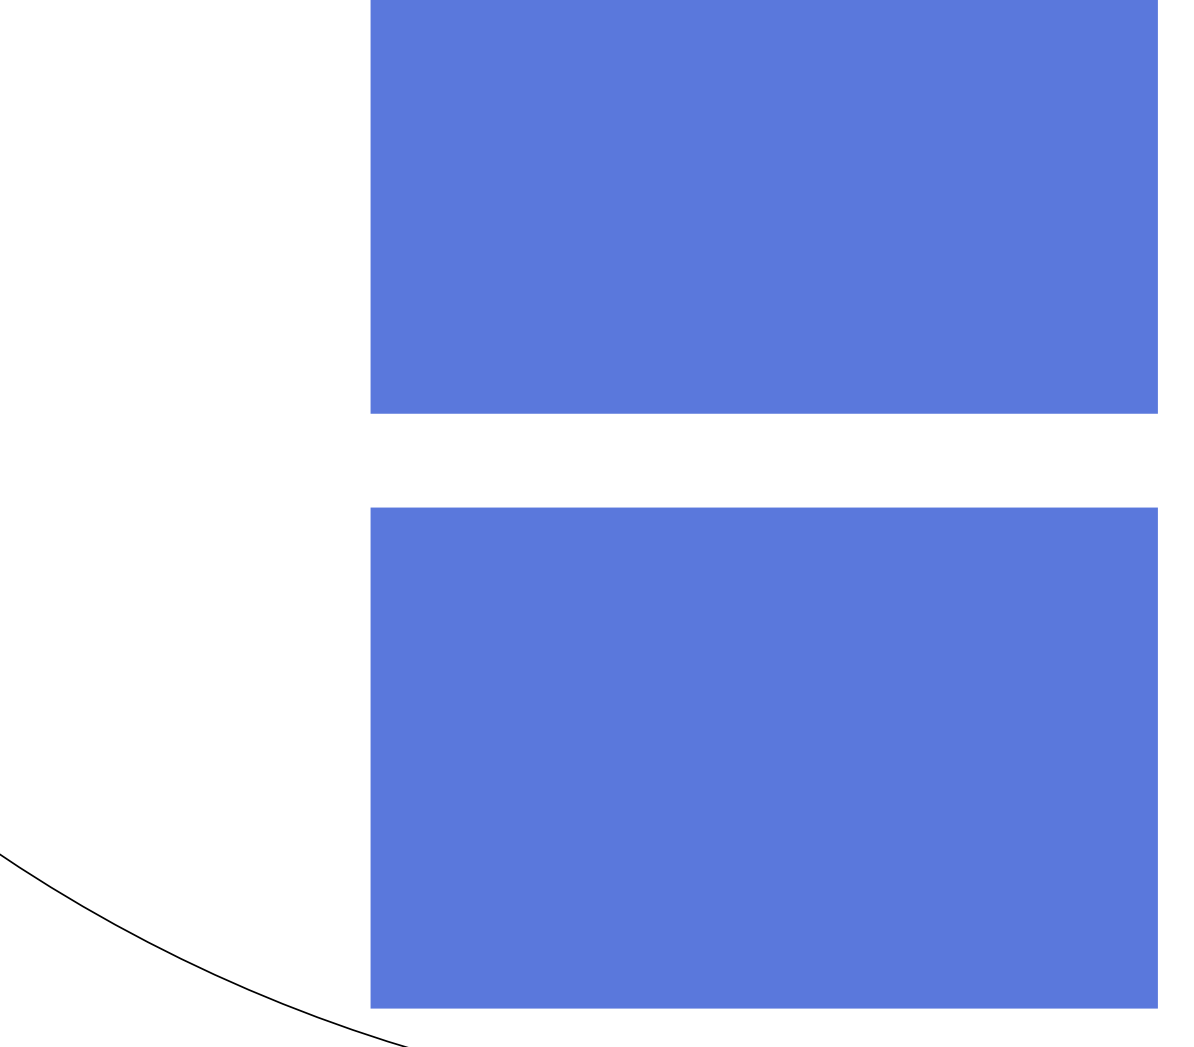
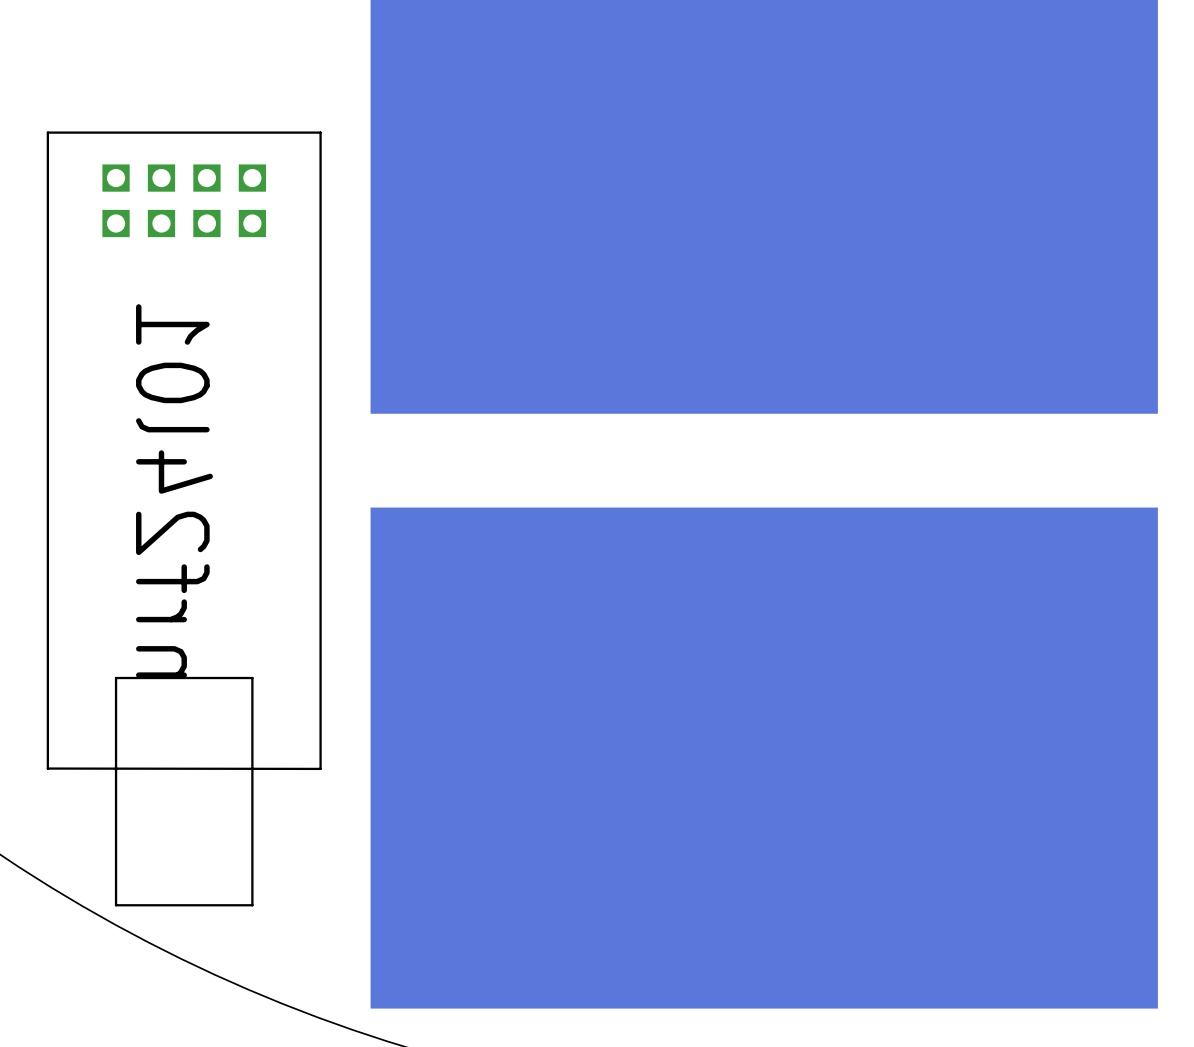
part: none -> (184, 518)

